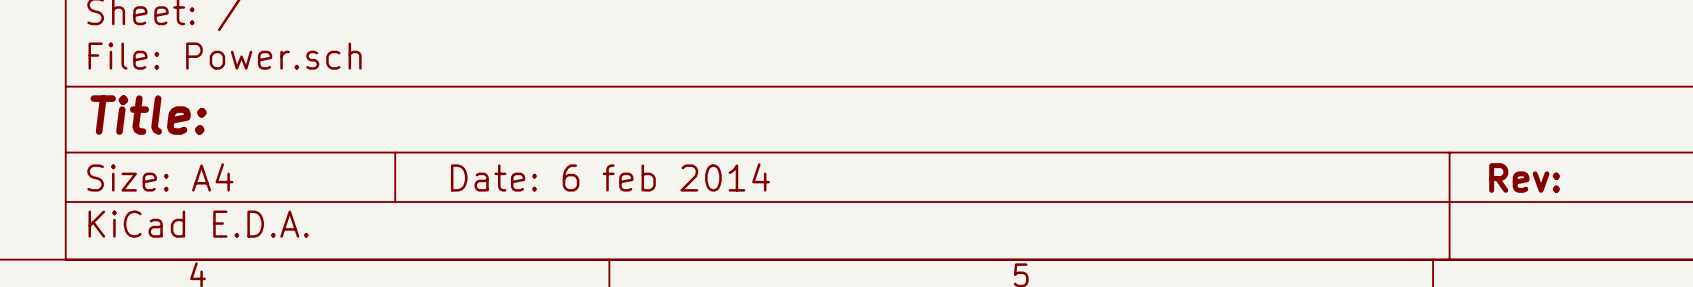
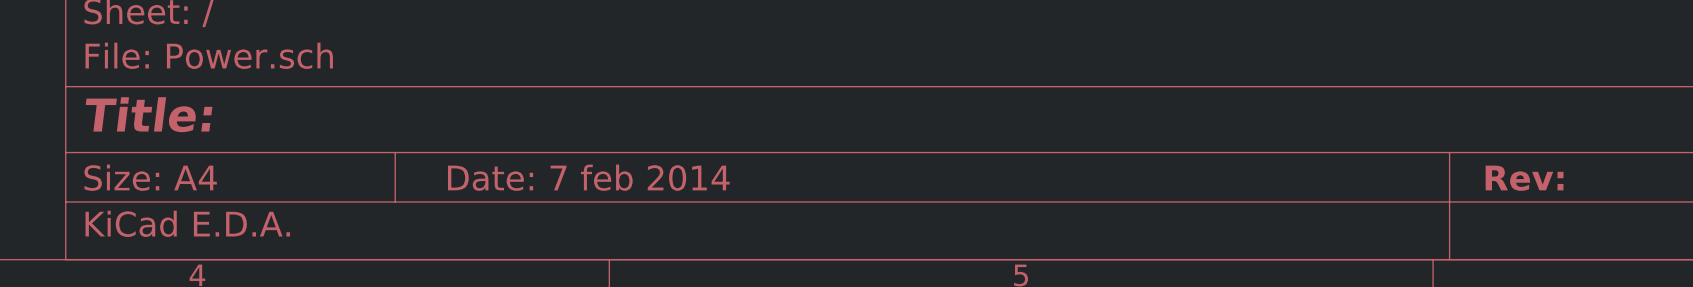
title block: Date: 6 feb 2014 (610, 177) -> Date: 7 feb 2014 (588, 177)

